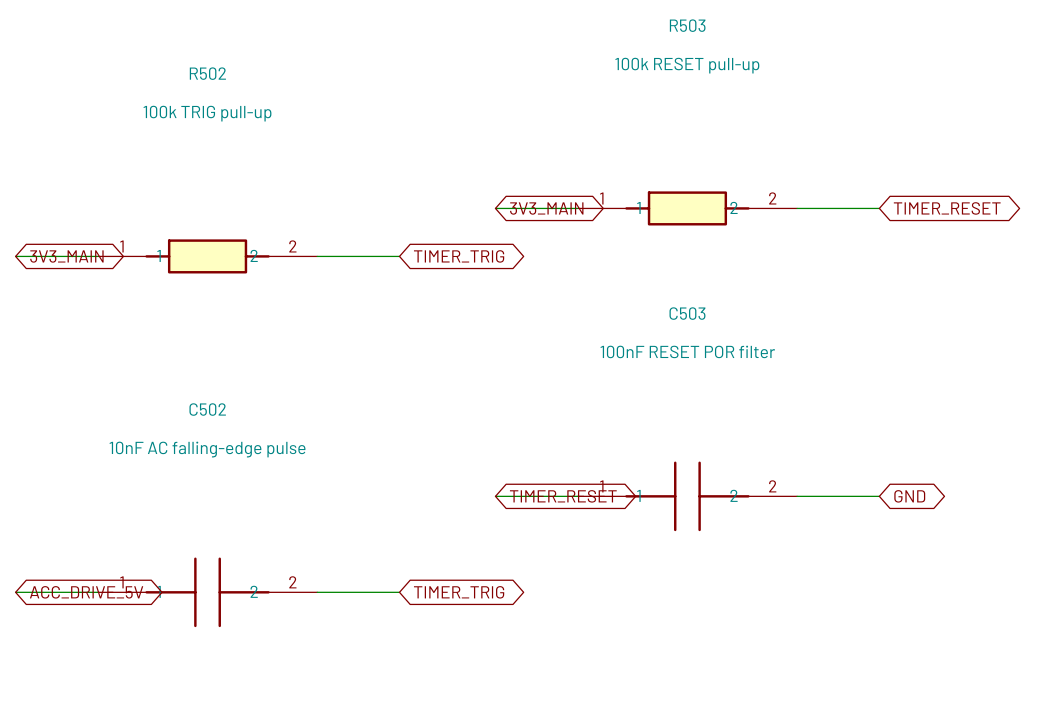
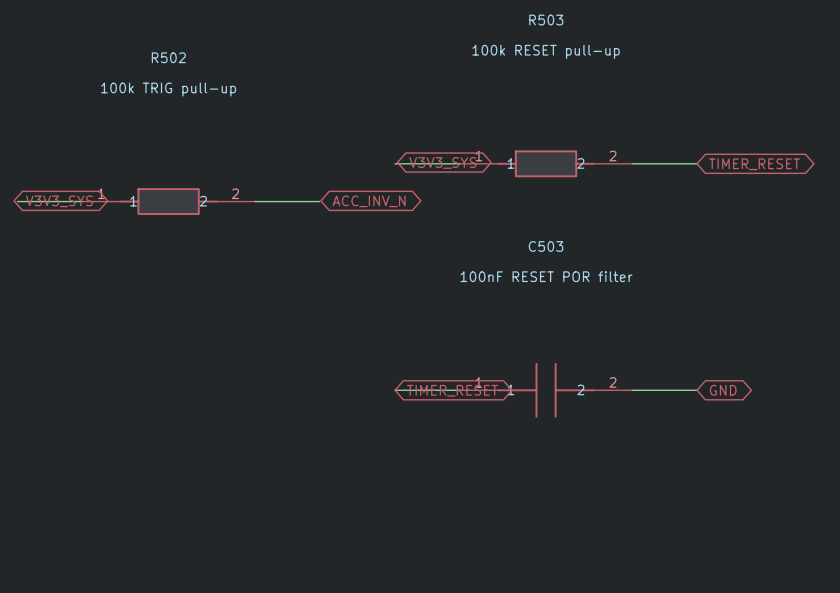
global label: 3V3_MAIN (546, 208) -> V3V3_SYS (442, 162)
global label: 3V3_MAIN (66, 256) -> V3V3_SYS (59, 201)
global label: TIMER_TRIG (459, 256) -> ACC_INV_N (369, 201)
wire: (15, 592) (97, 592) -> none
global label: ACC_DRIVE_5V (86, 592) -> none
C502: 10nF AC falling-edge pulse (207, 592) -> none
wire: (317, 592) (399, 592) -> none
global label: TIMER_TRIG (459, 592) -> none

